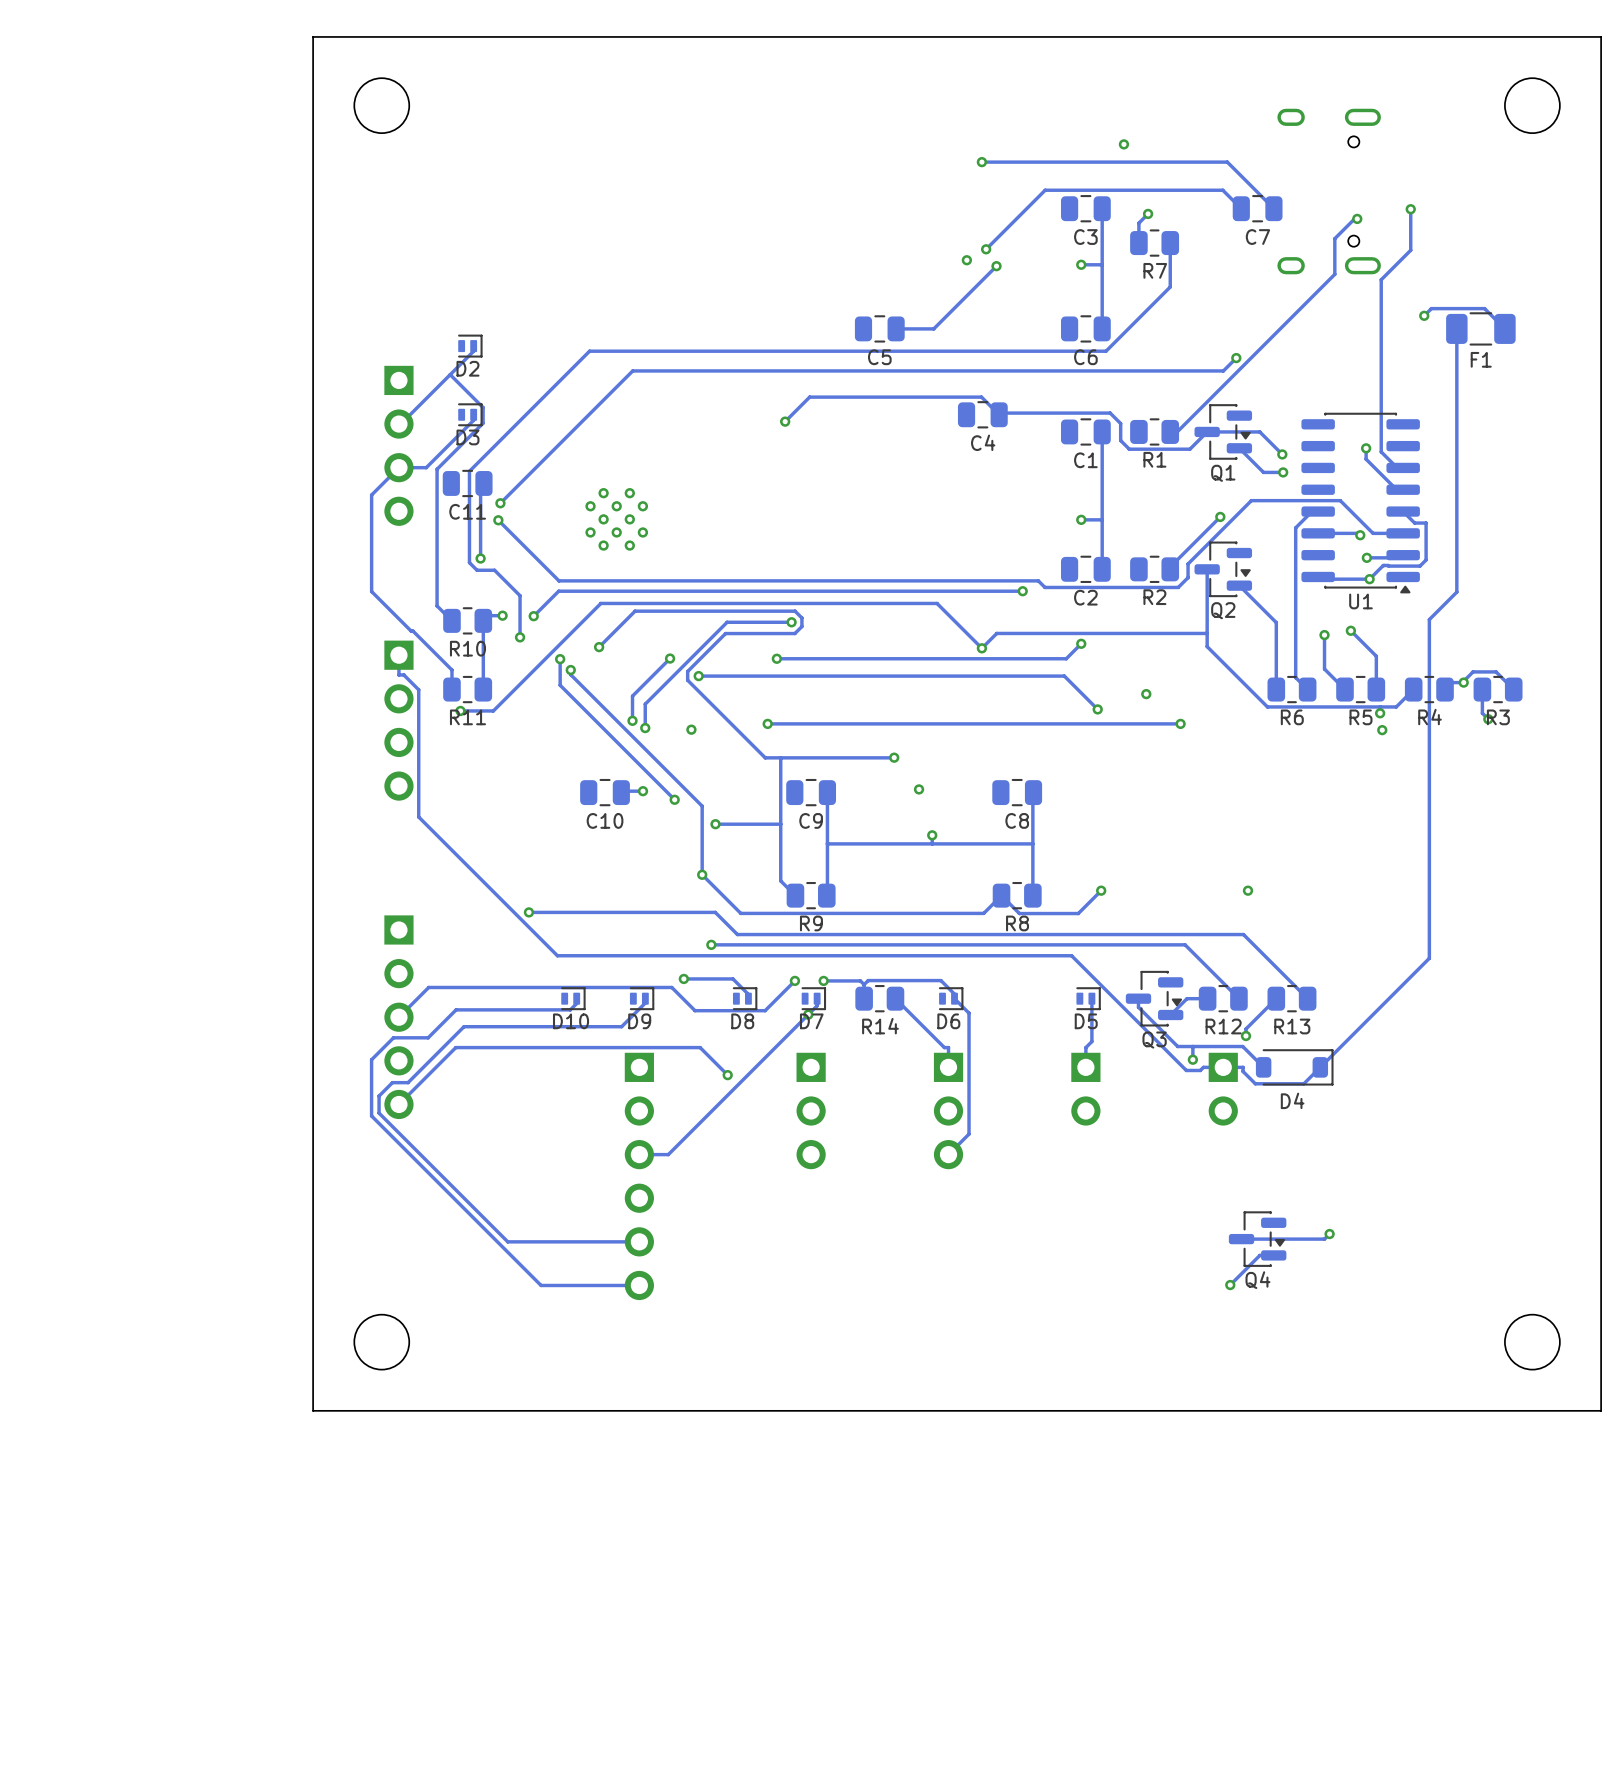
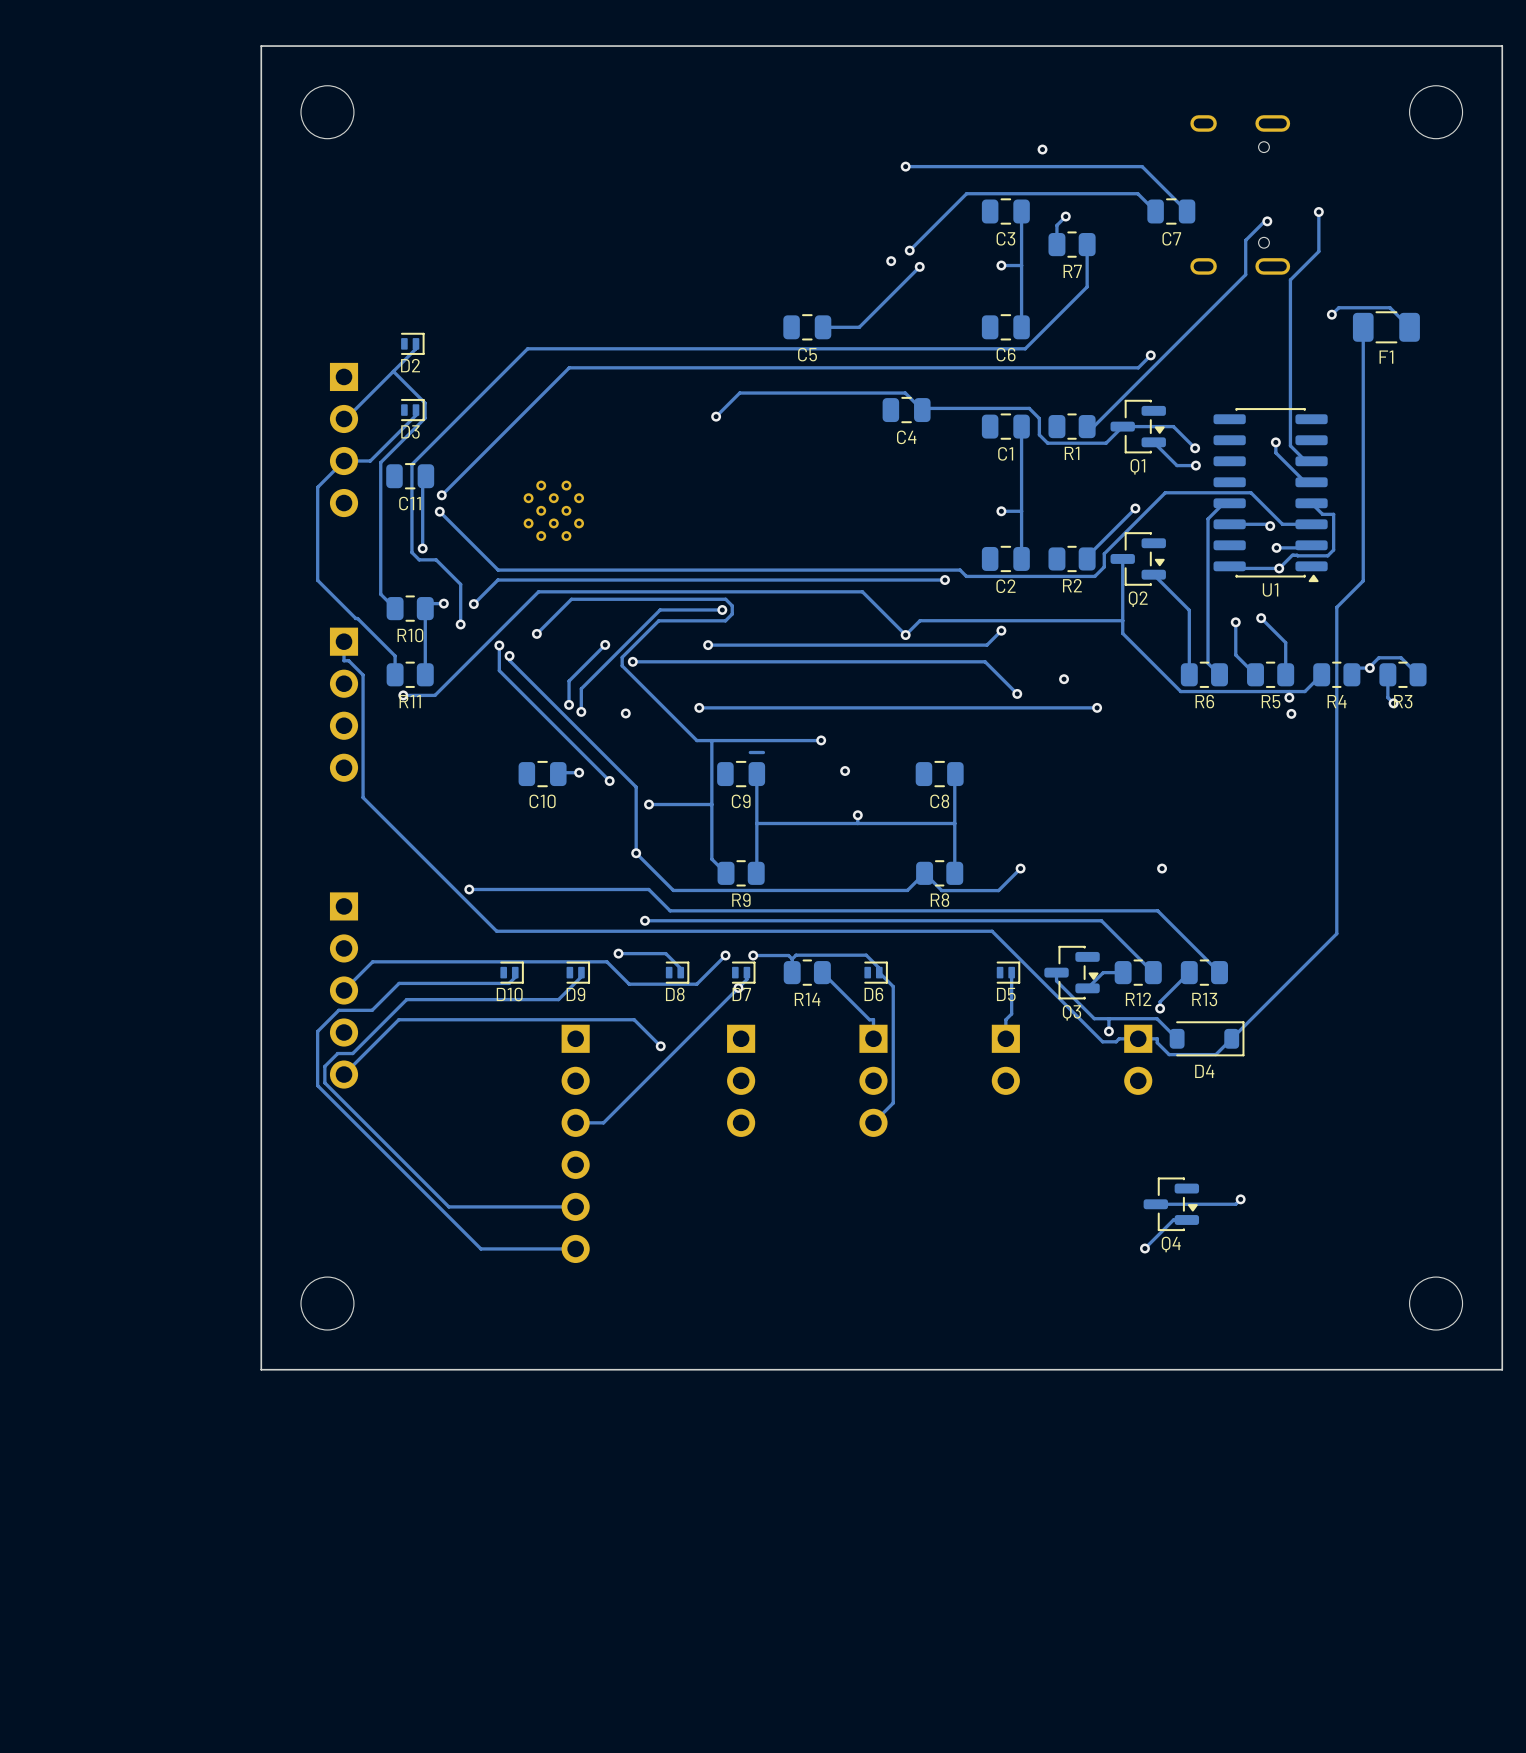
track: none -> (763, 752) (750, 752)

